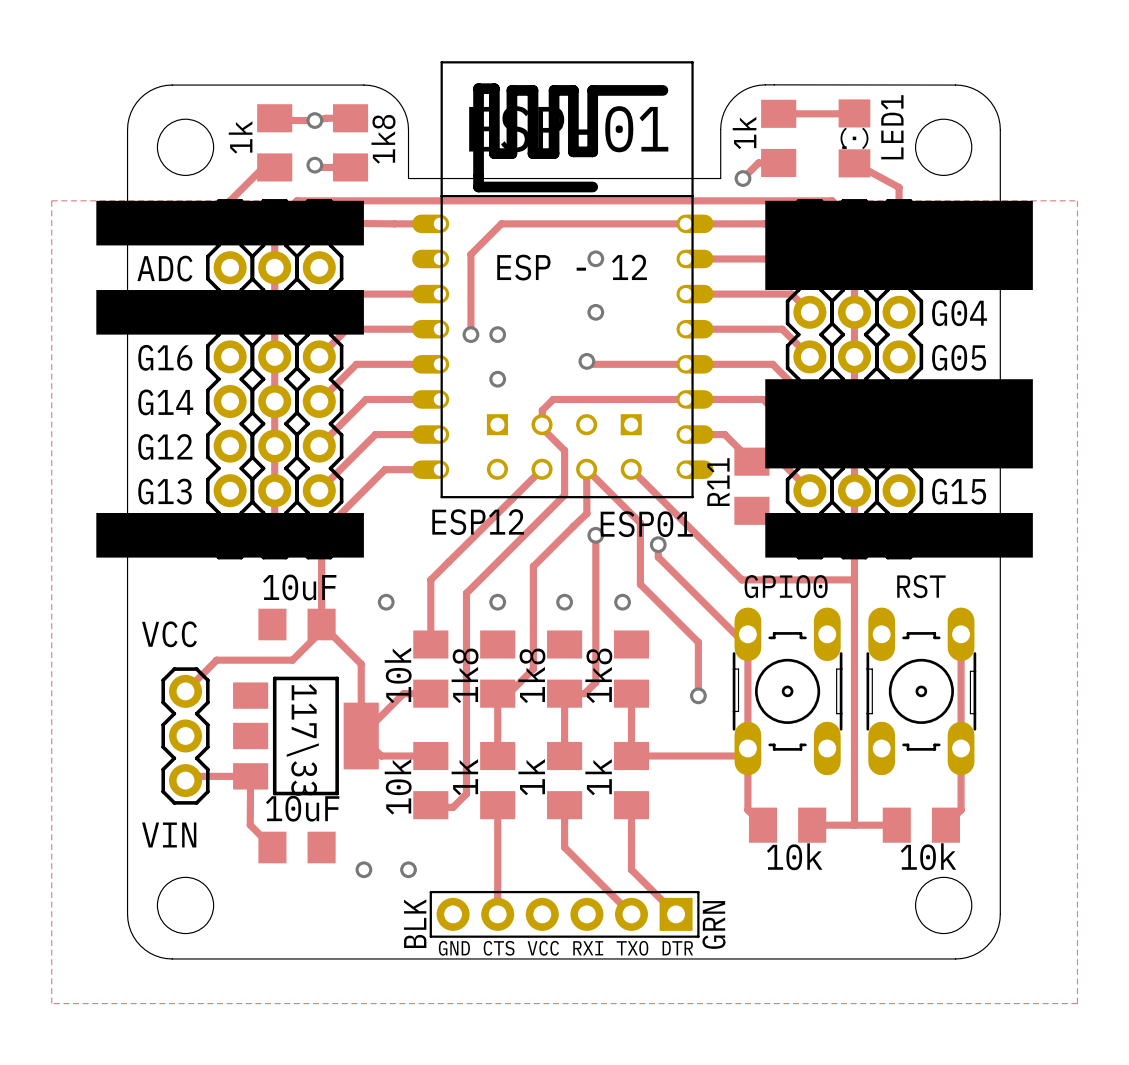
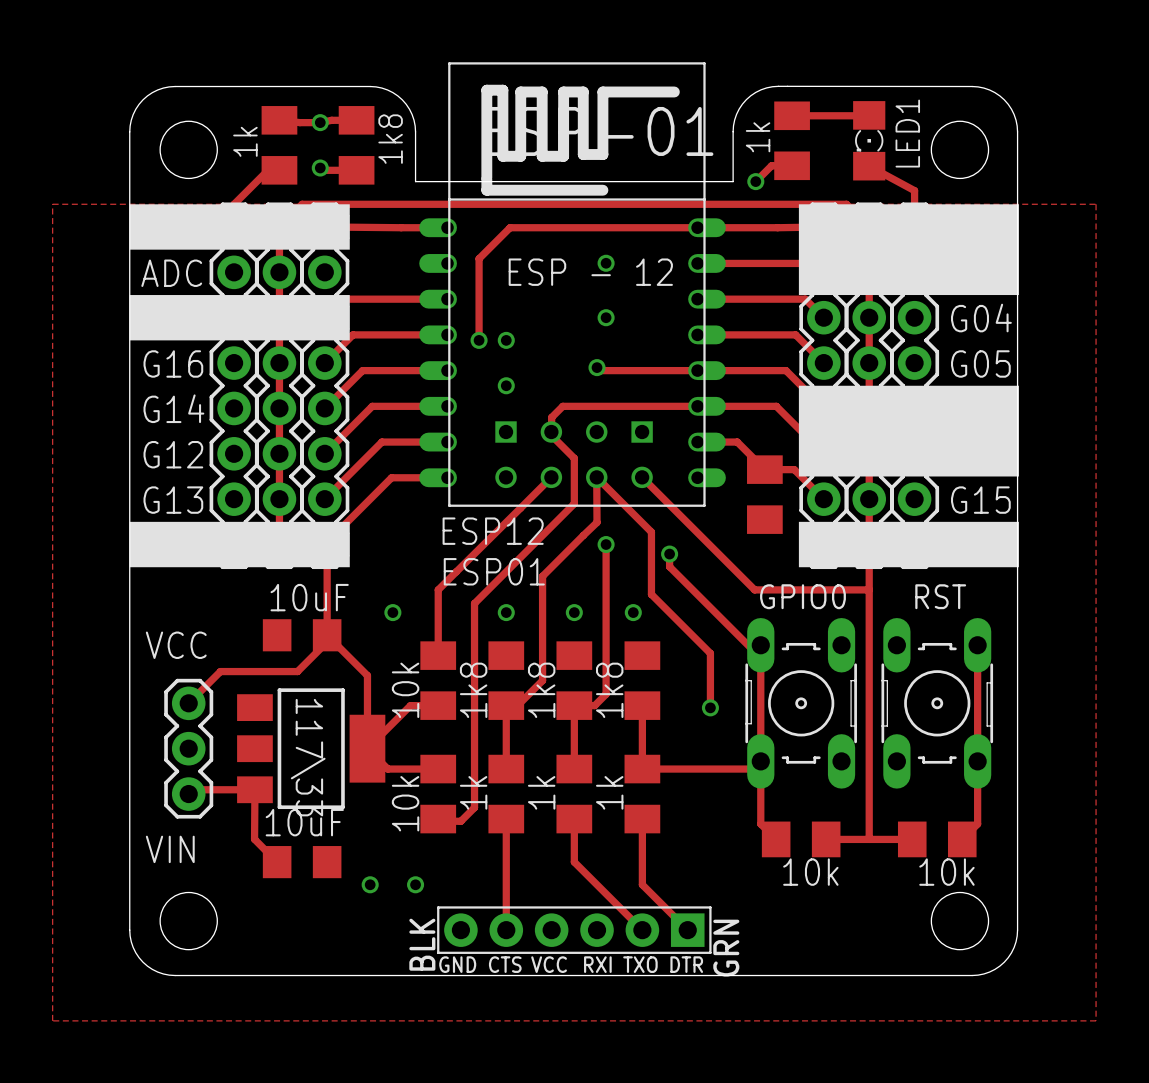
drawing shape: [96, 200, 364, 246] -> [129, 204, 350, 250]
drawing shape: [765, 200, 1033, 246] -> [798, 204, 1019, 250]
drawing shape: [765, 245, 1033, 291] -> [798, 249, 1019, 296]
drawing shape: [96, 290, 364, 335] -> [129, 295, 350, 341]
drawing shape: [765, 379, 1033, 469] -> [798, 385, 1019, 477]
R11 name: R11 (718, 482) -> none
drawing shape: [96, 513, 364, 558] -> [129, 521, 350, 568]
drawing shape: [765, 513, 1033, 558] -> [798, 521, 1019, 568]
part value position: ESP01 (646, 524) -> ESP01 (494, 571)

